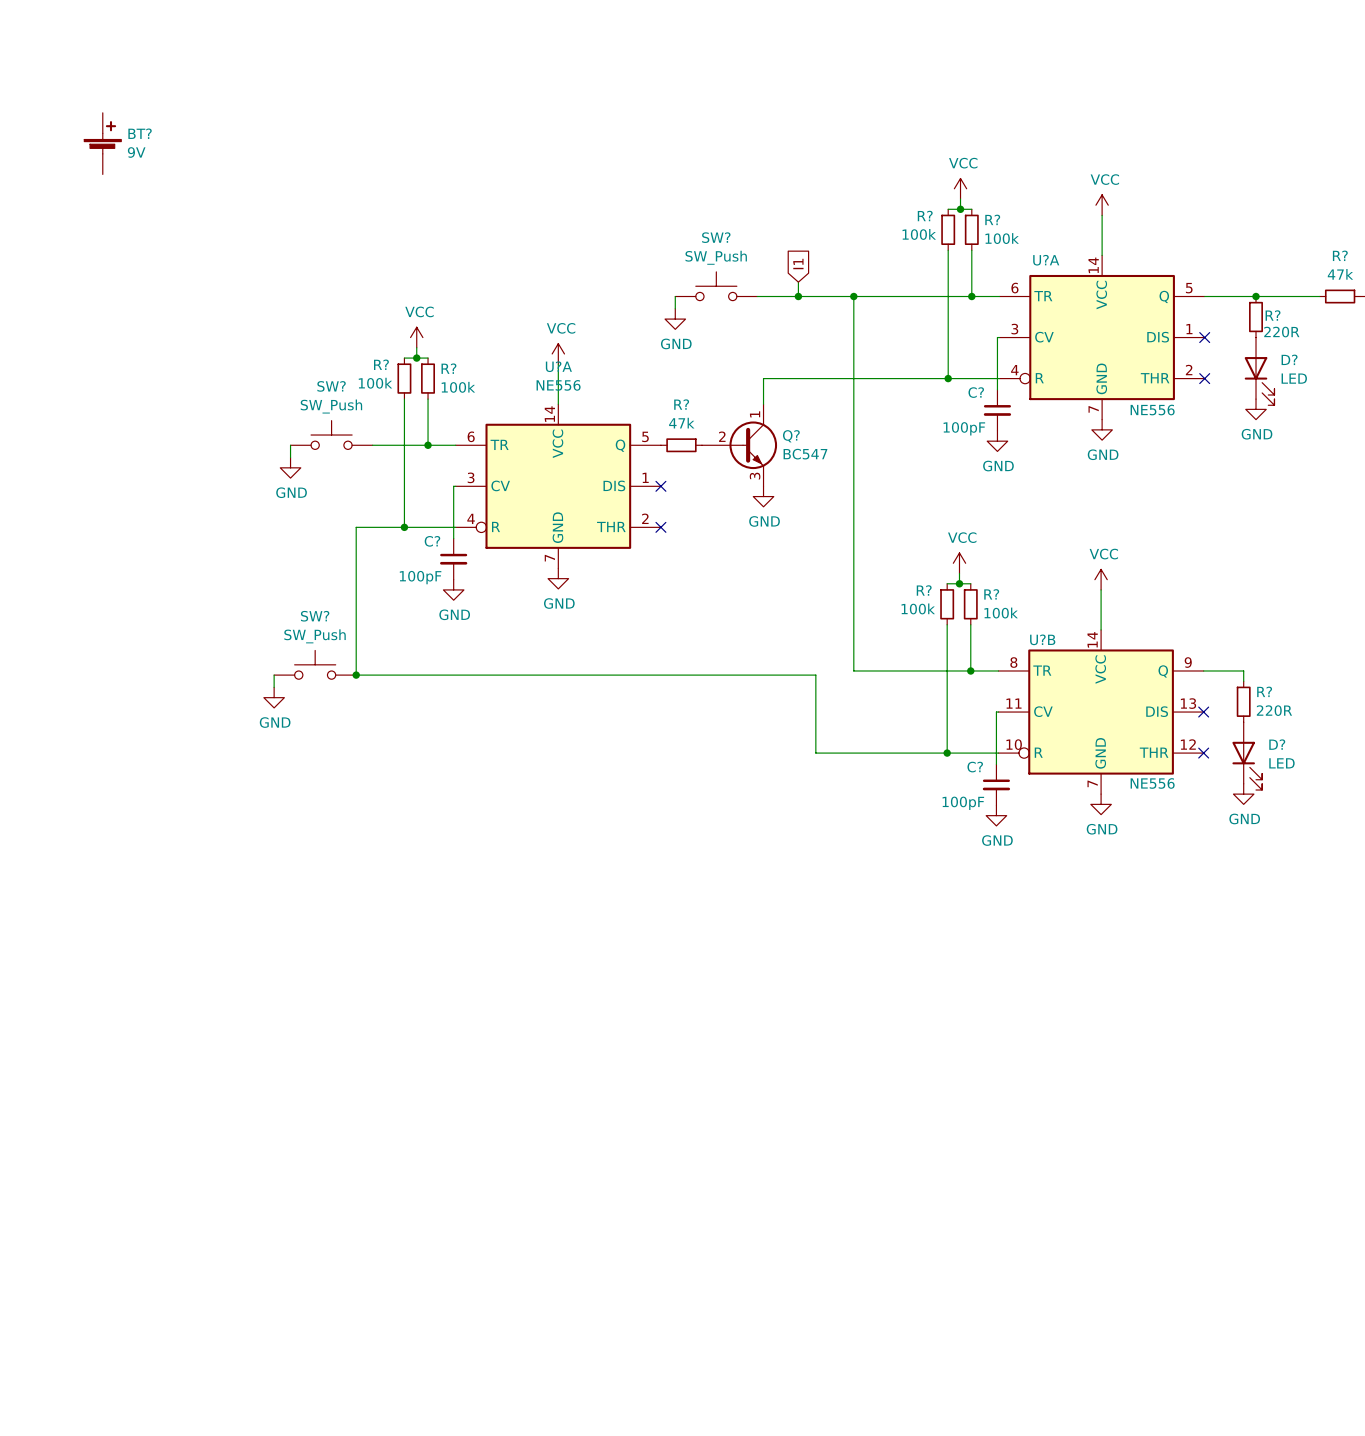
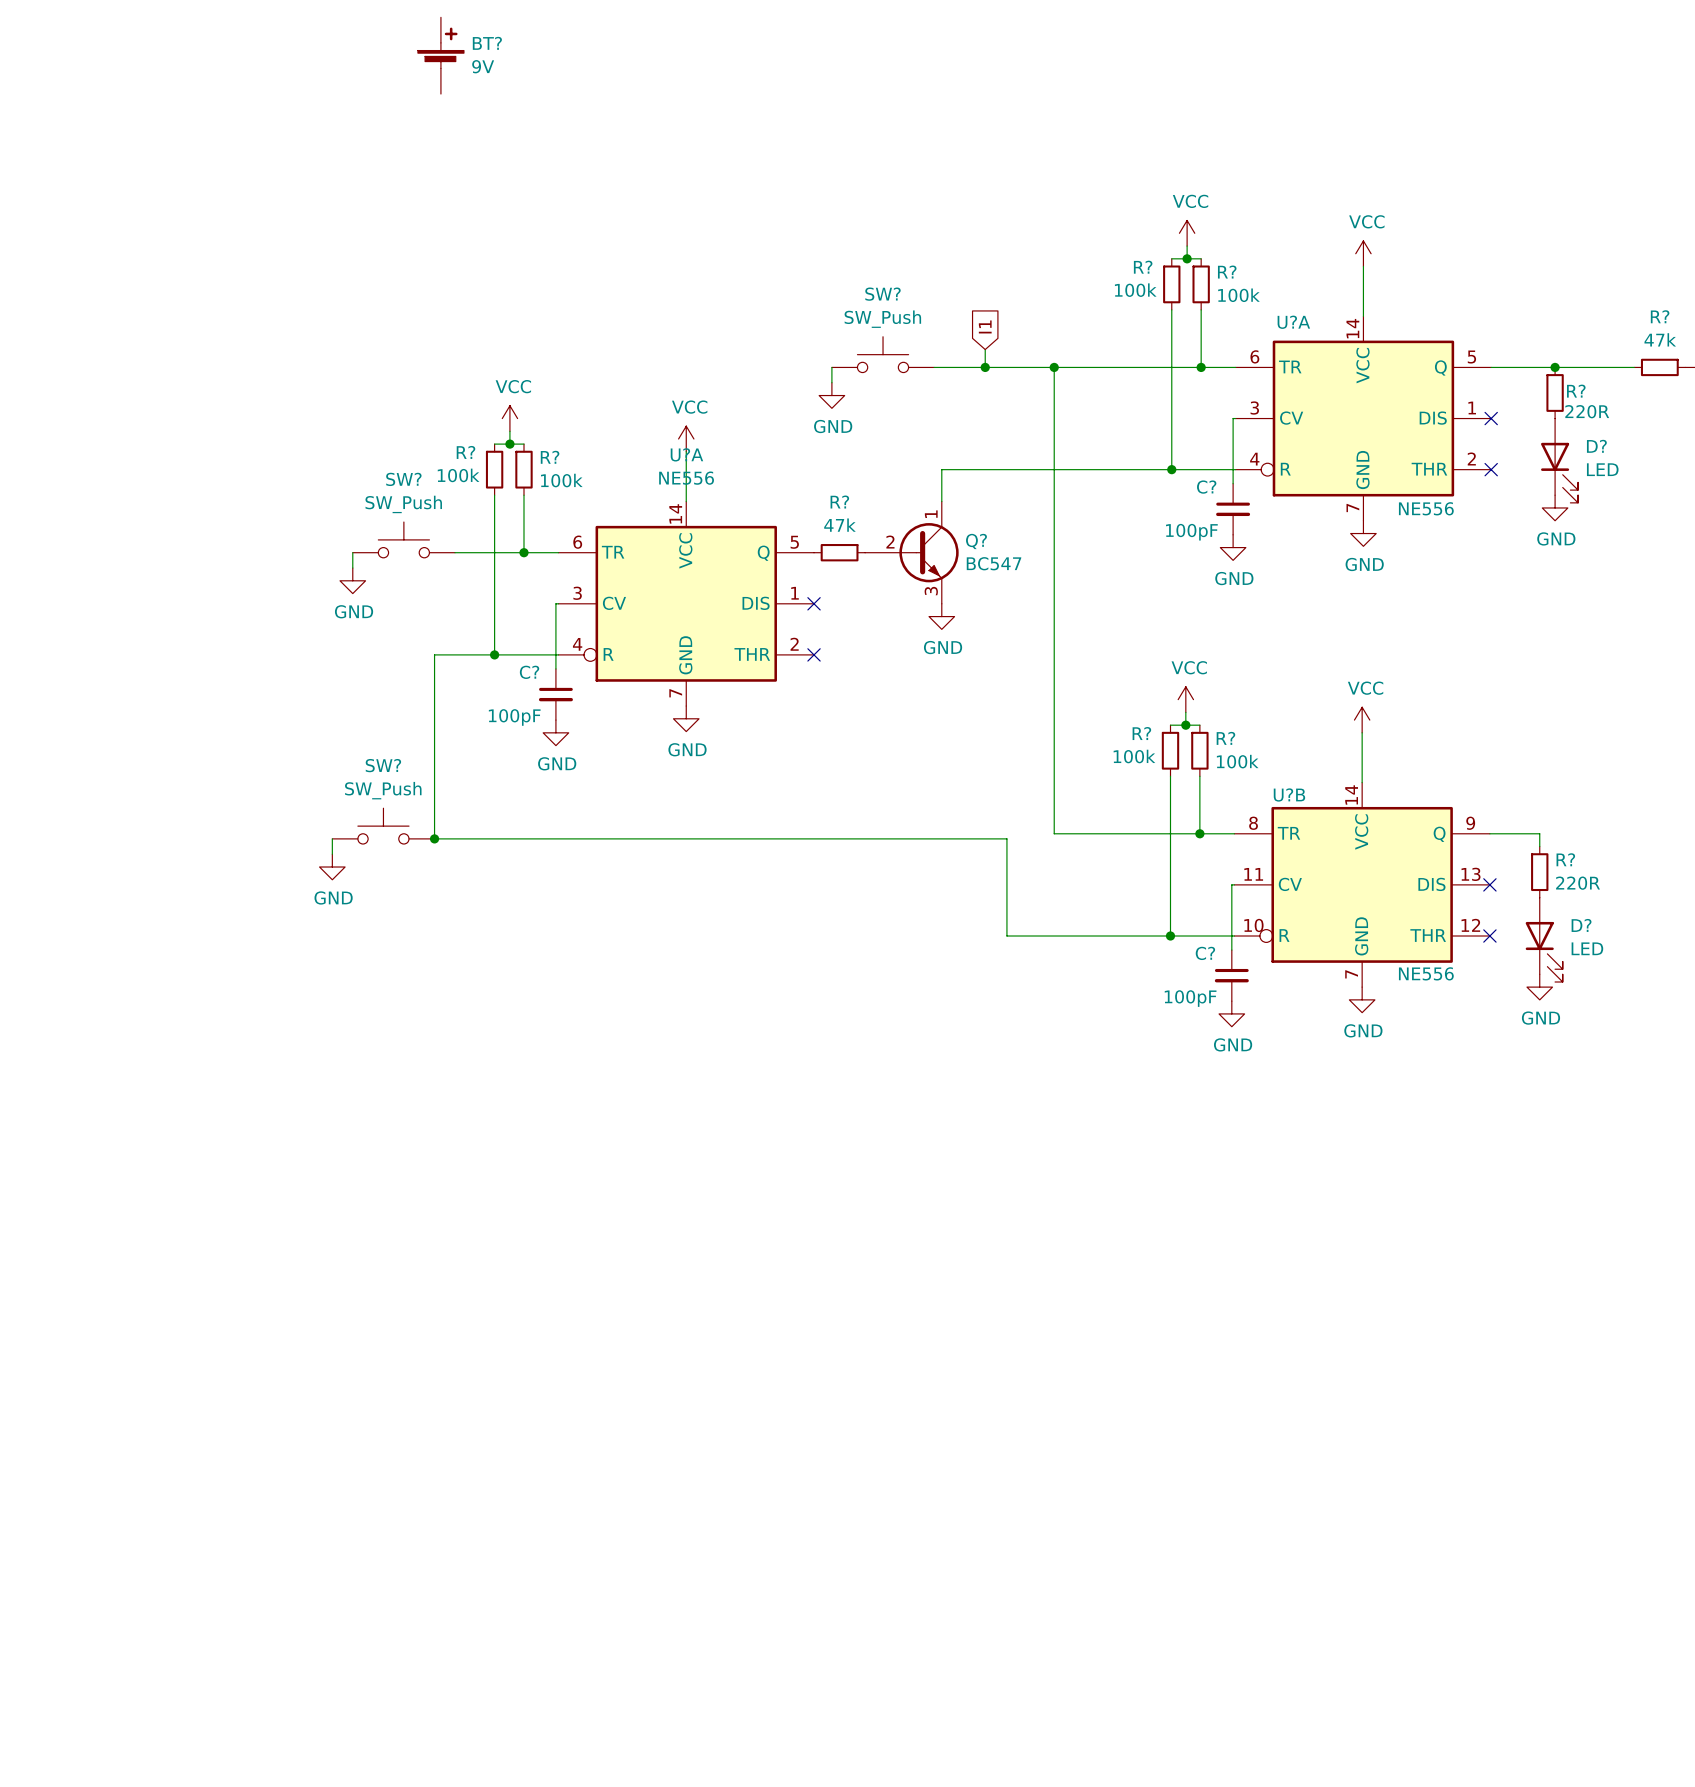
BT?: none -> 9V (440, 55)
BT?: 9V (102, 143) -> none

